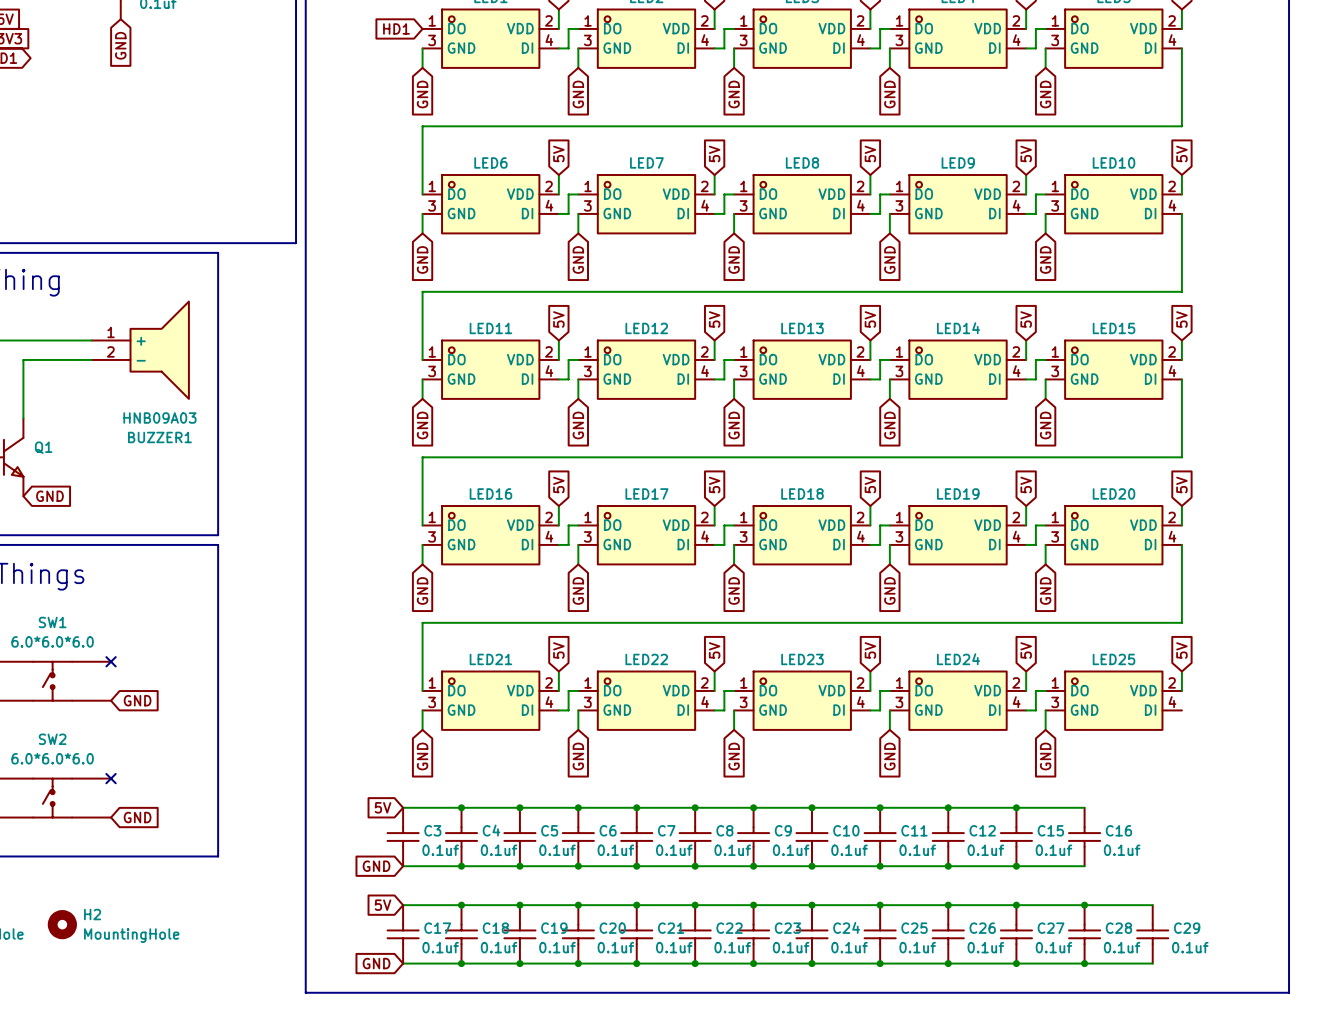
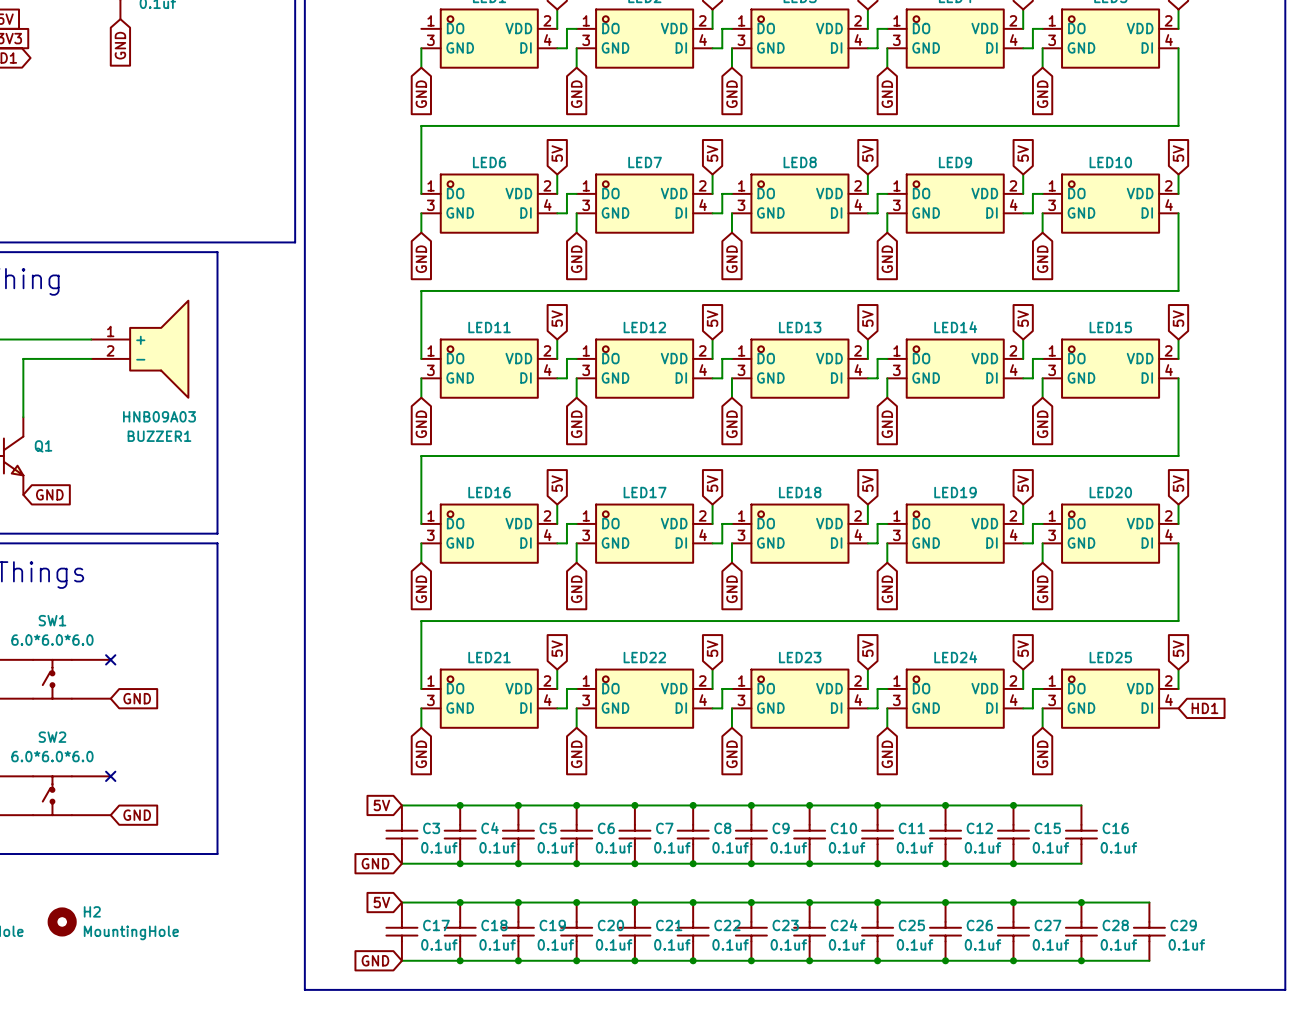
global label: HD1 (396, 28) -> none
global label: none -> HD1 (1205, 708)

